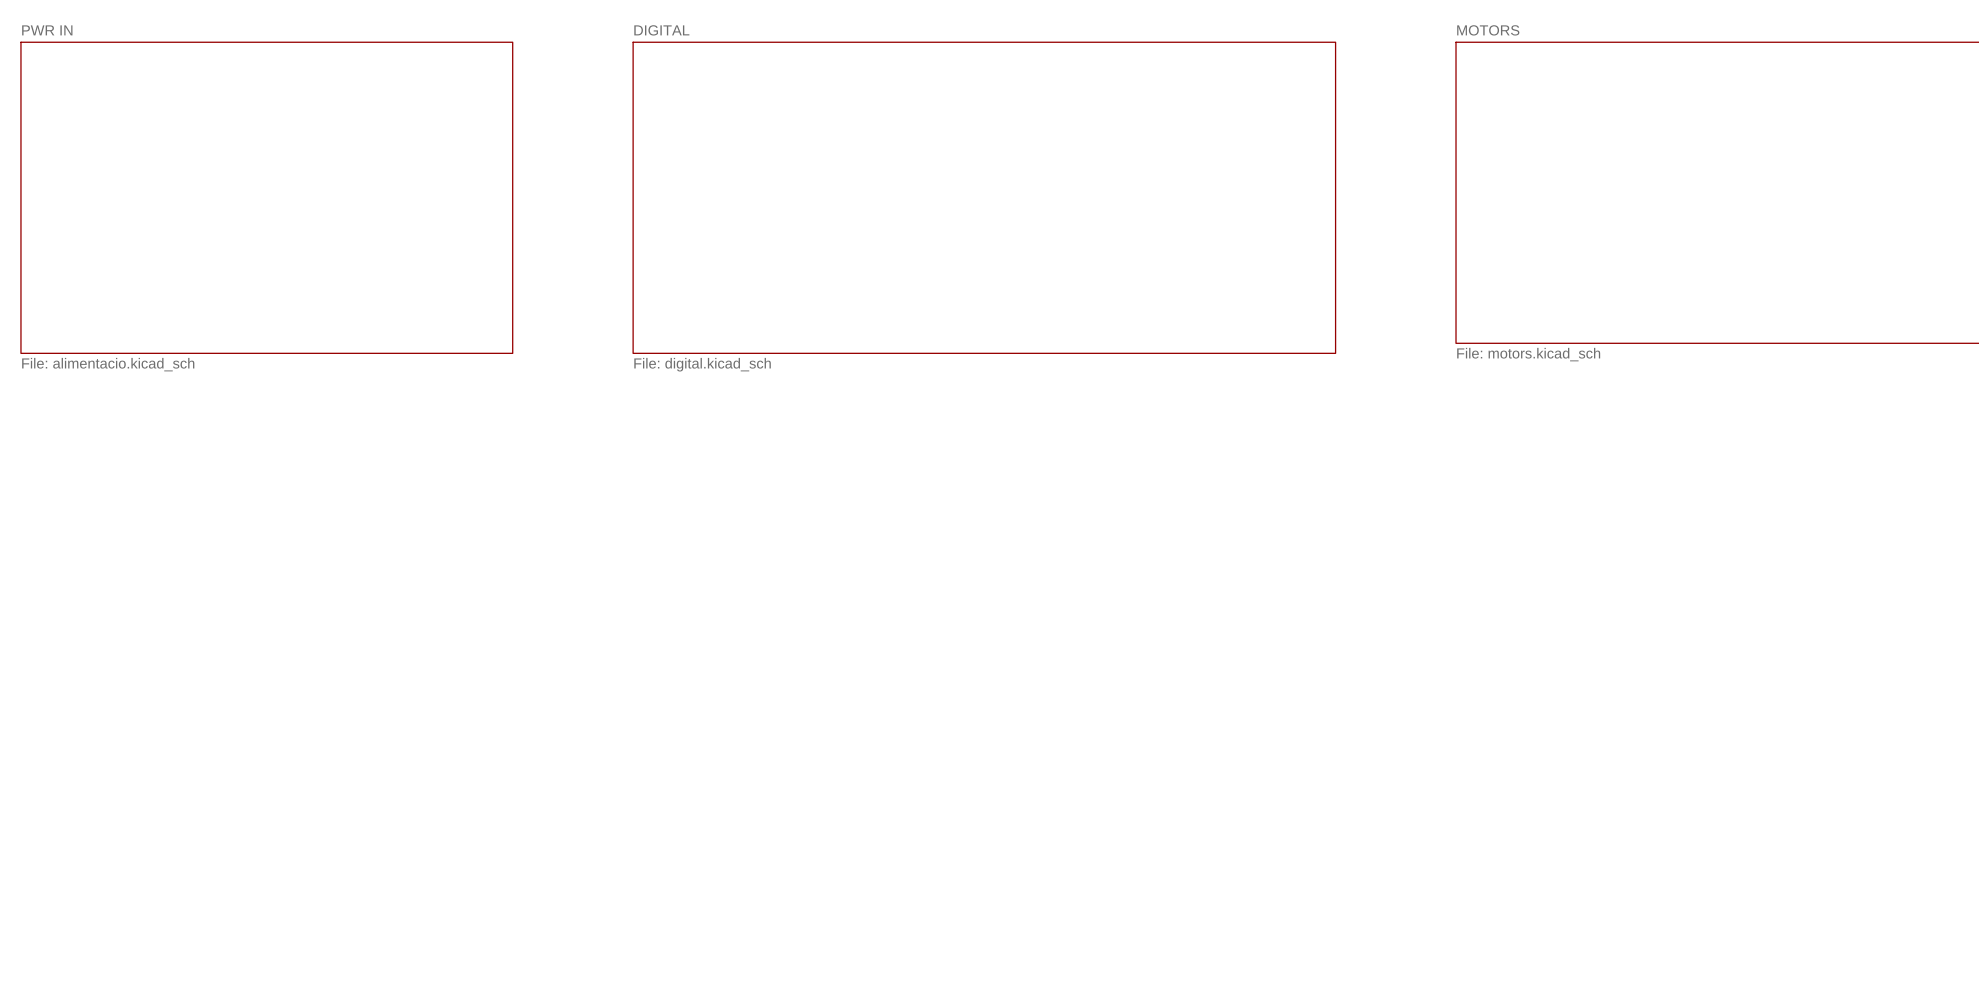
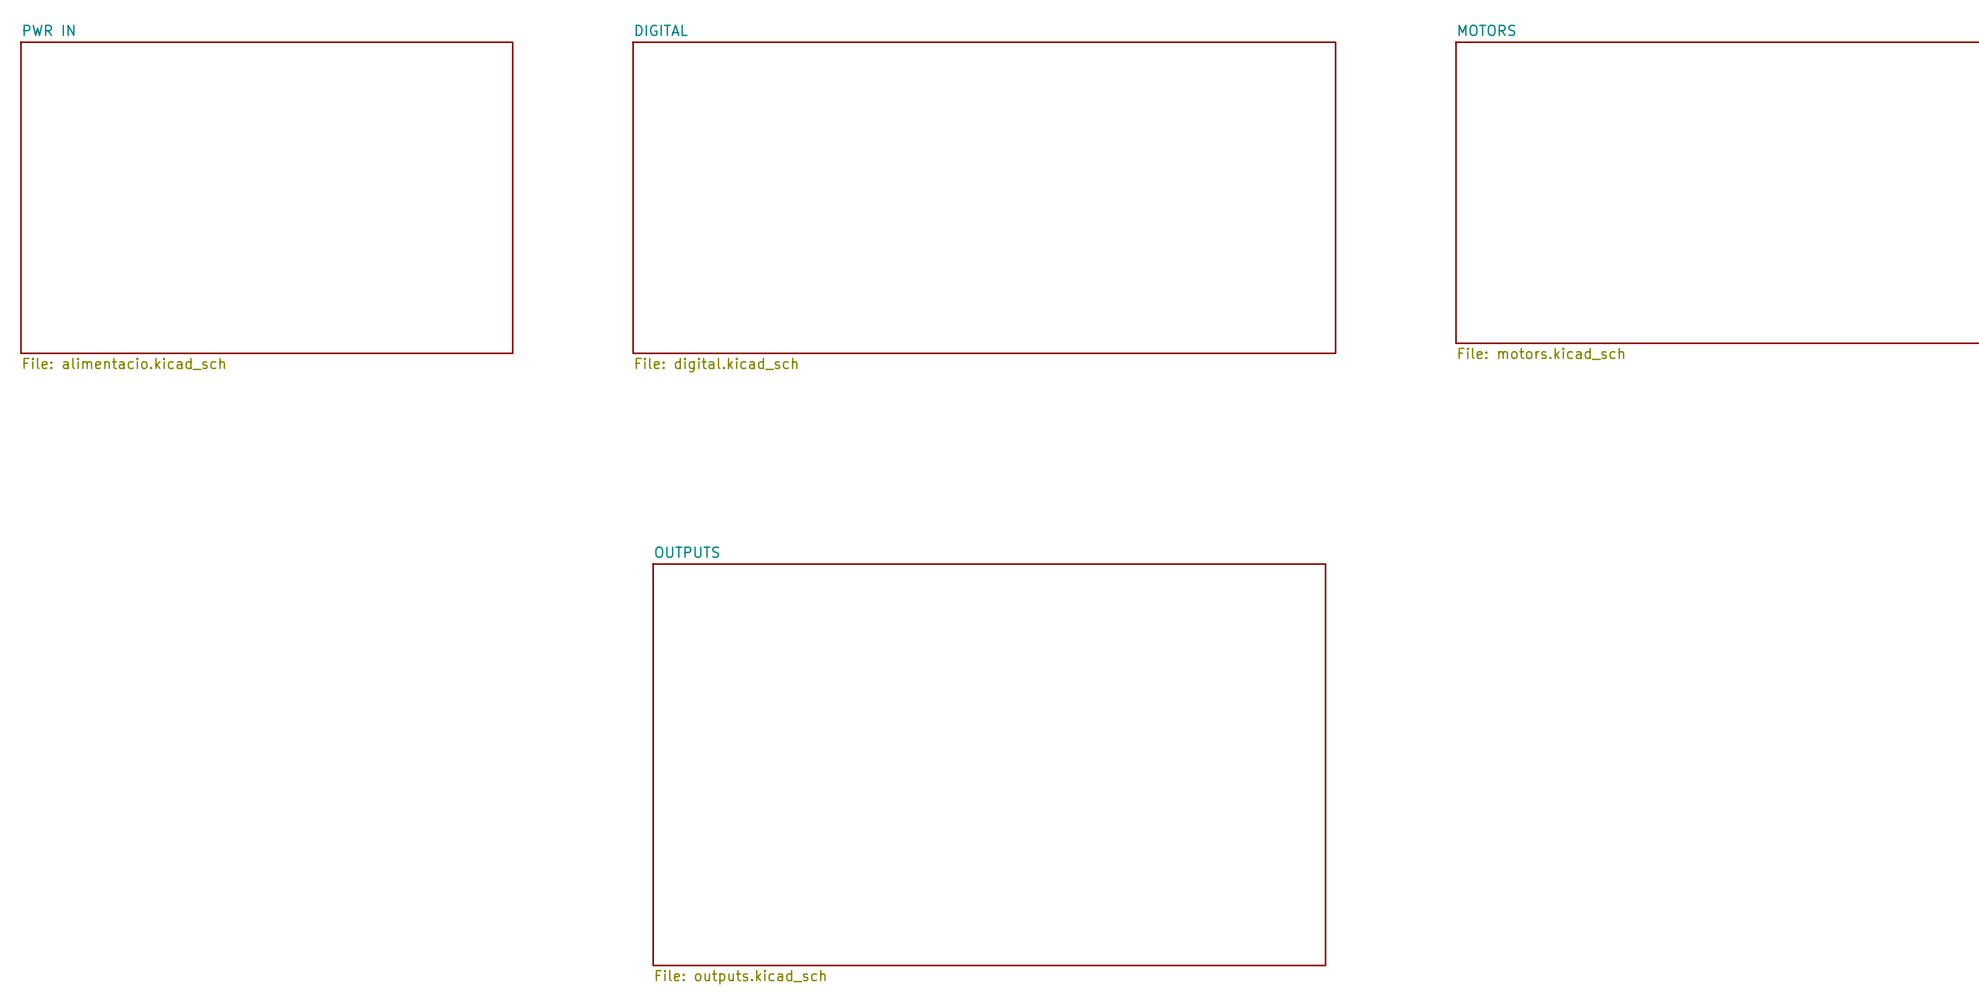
sheet OUTPUTS: none -> File: outputs.kicad_sch (989, 764)

